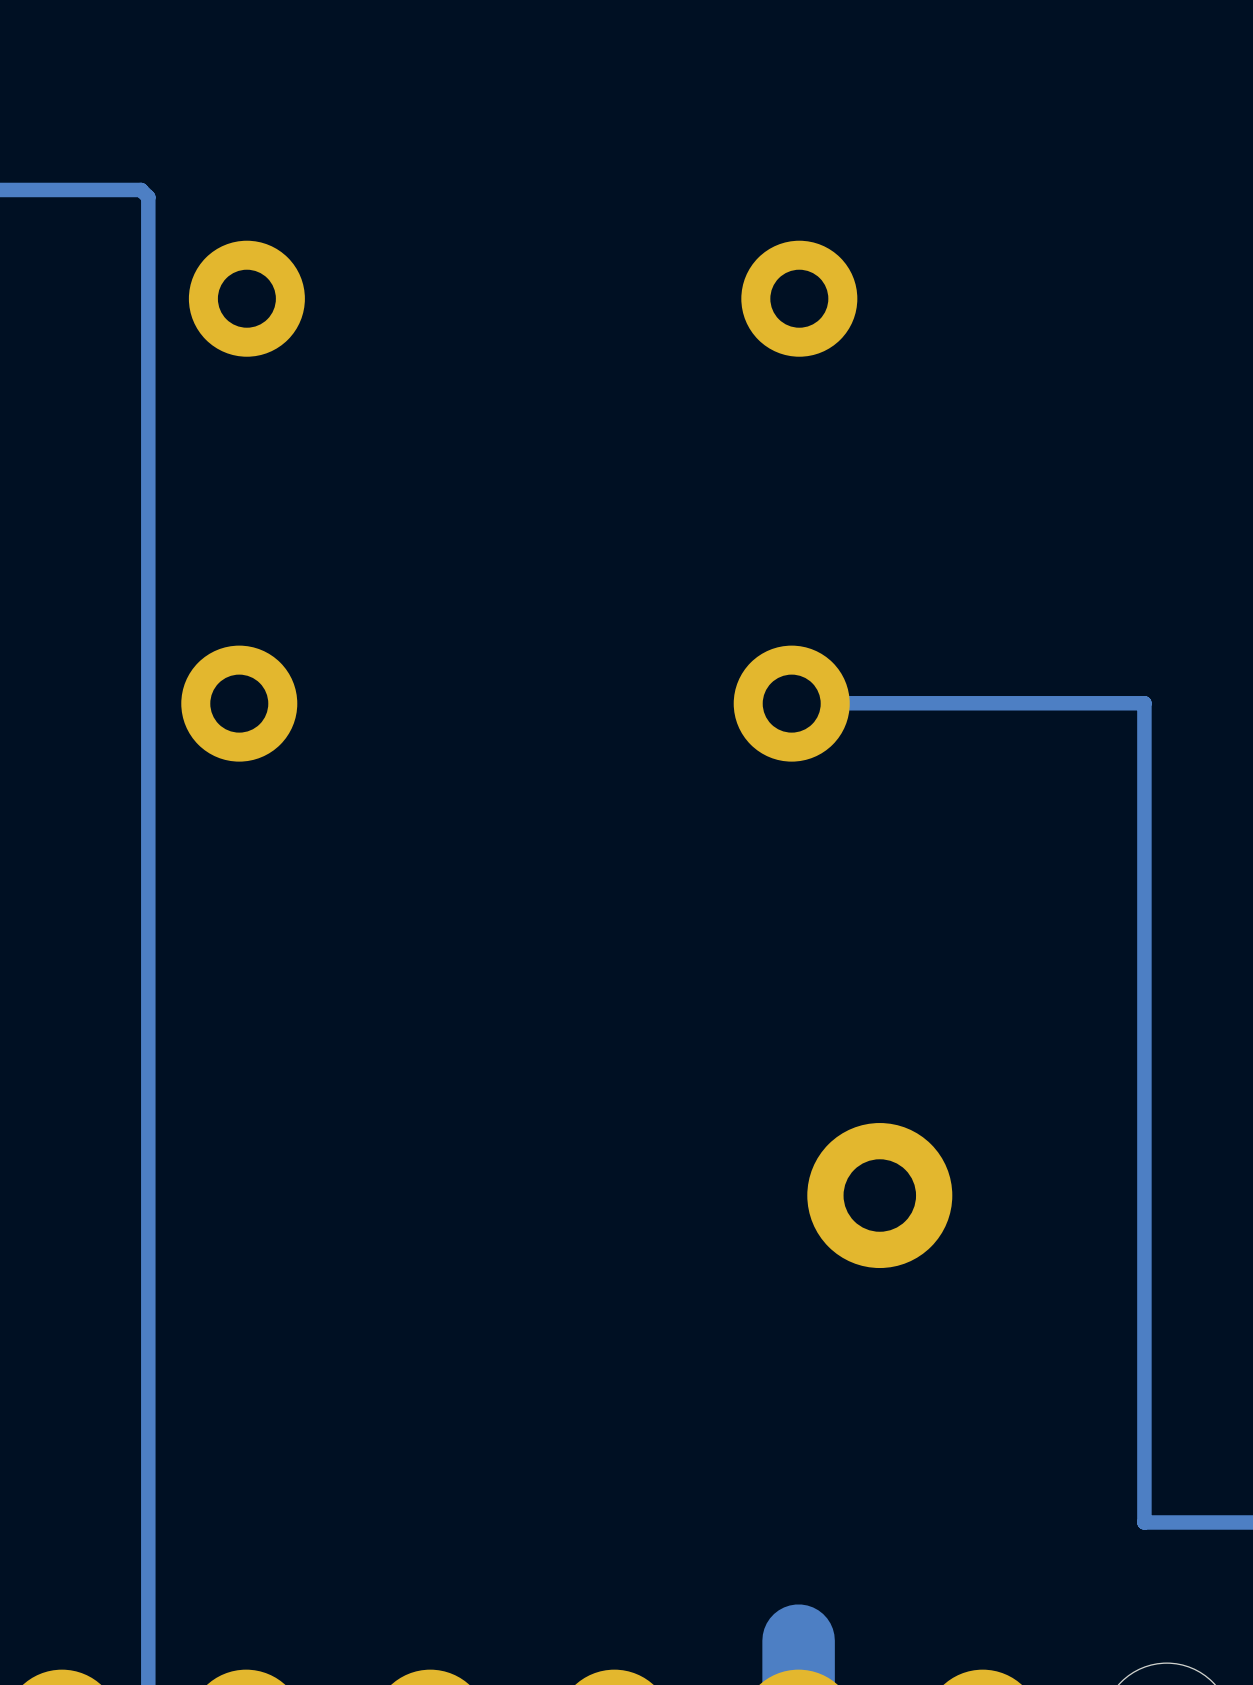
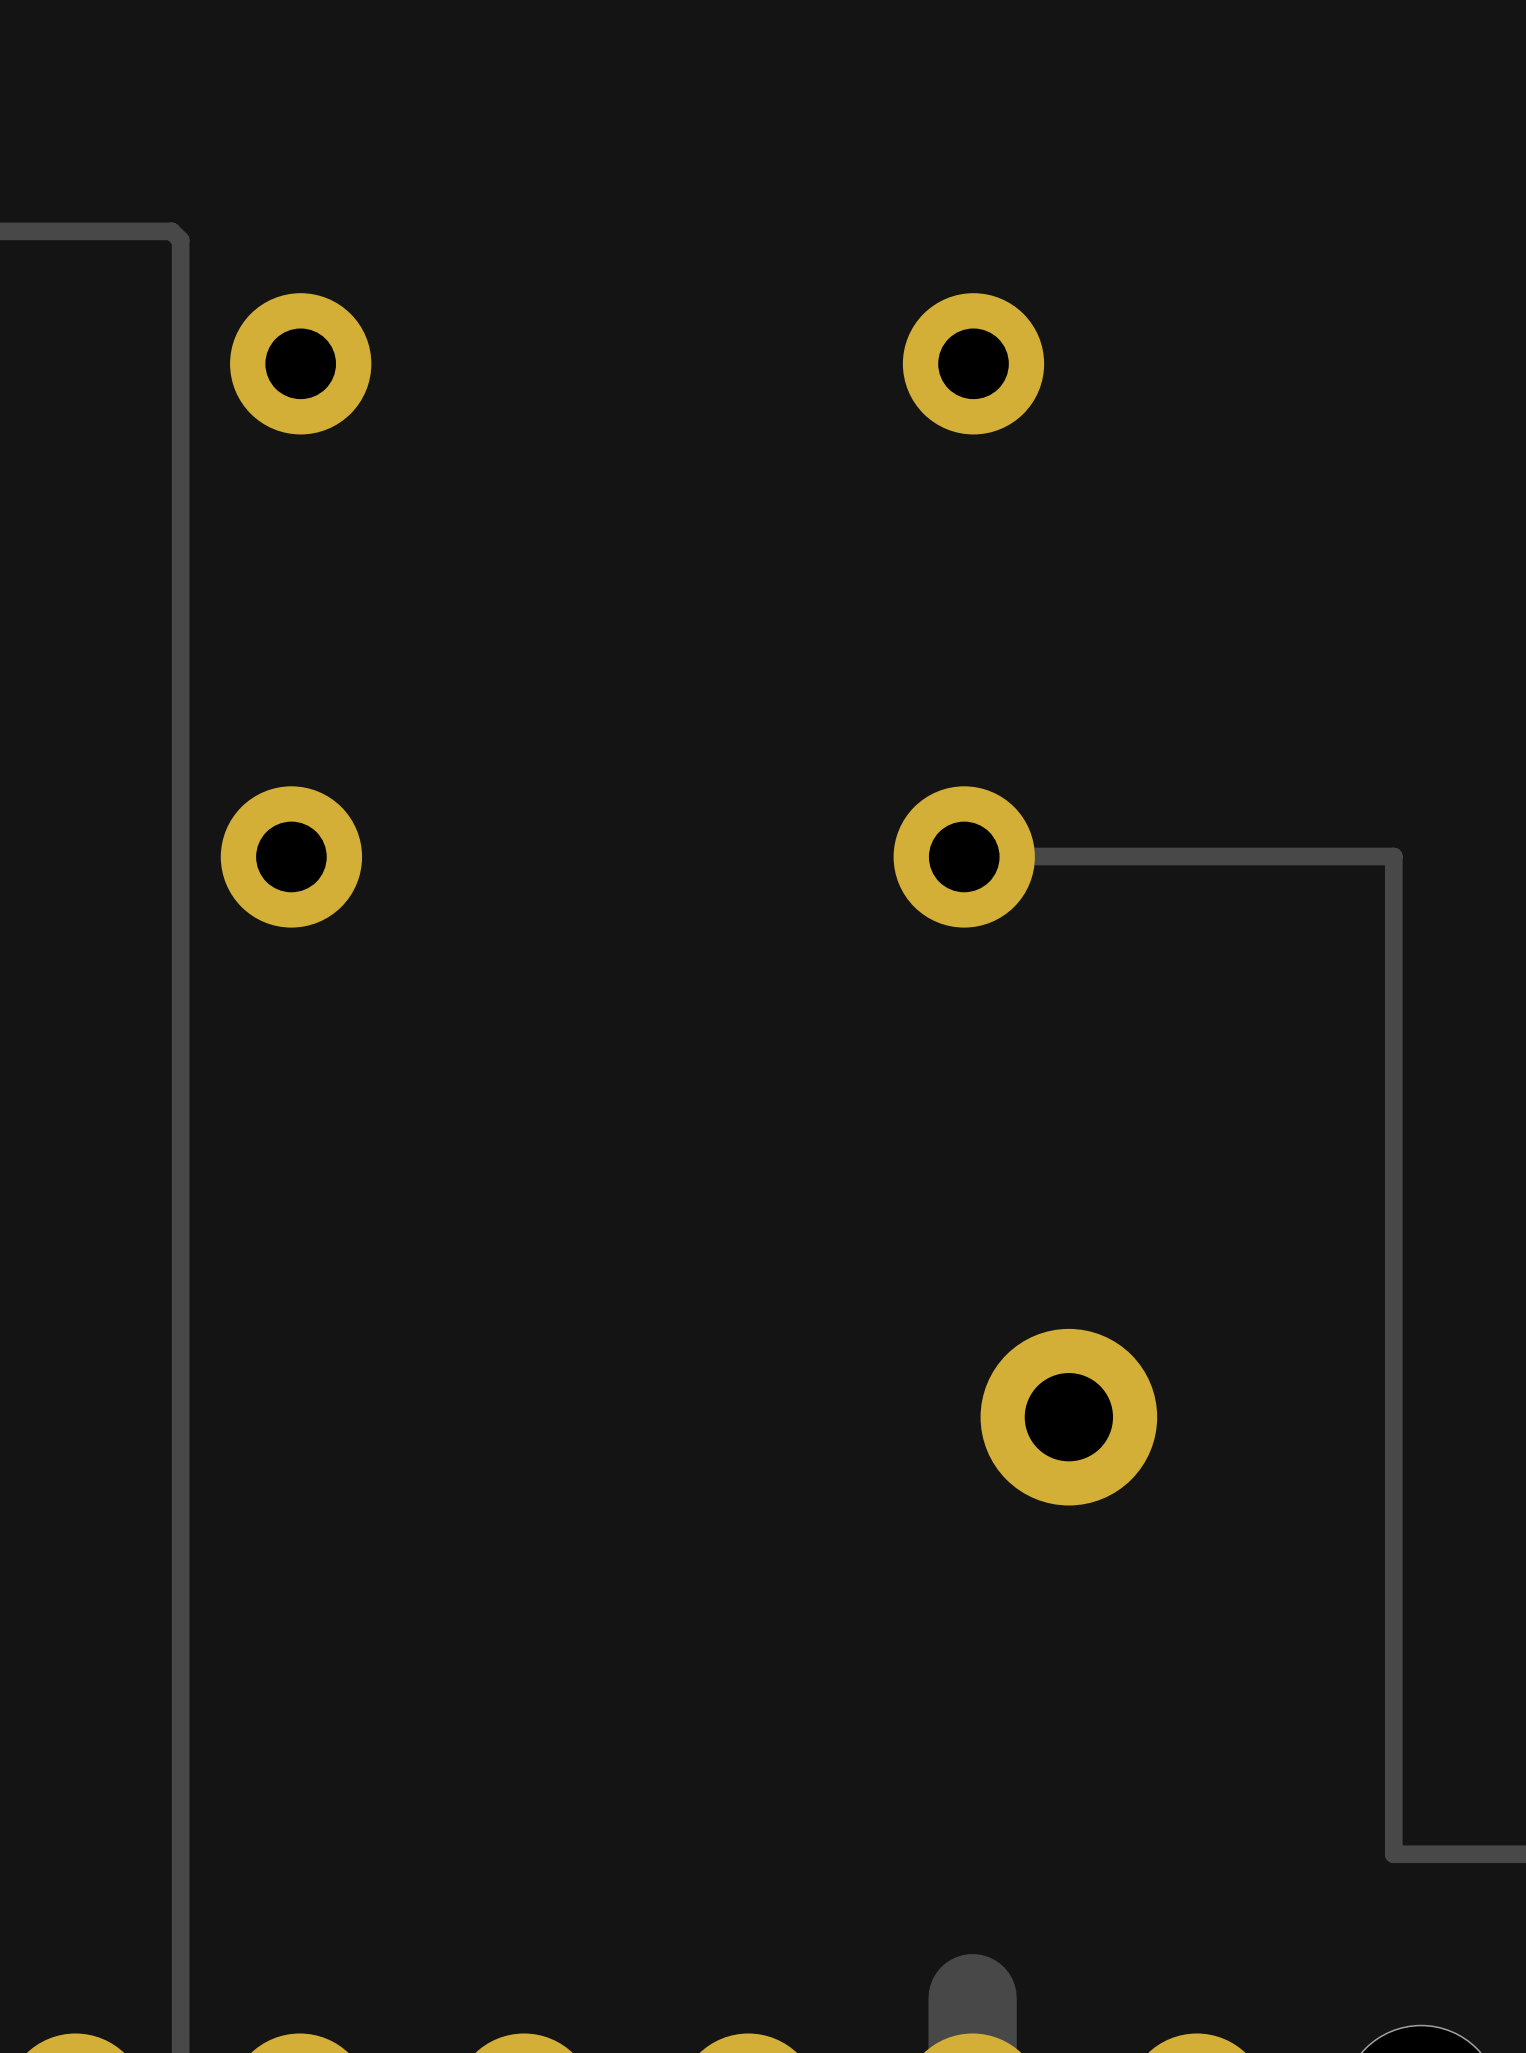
part position: (879, 1195) -> (1068, 1417)

